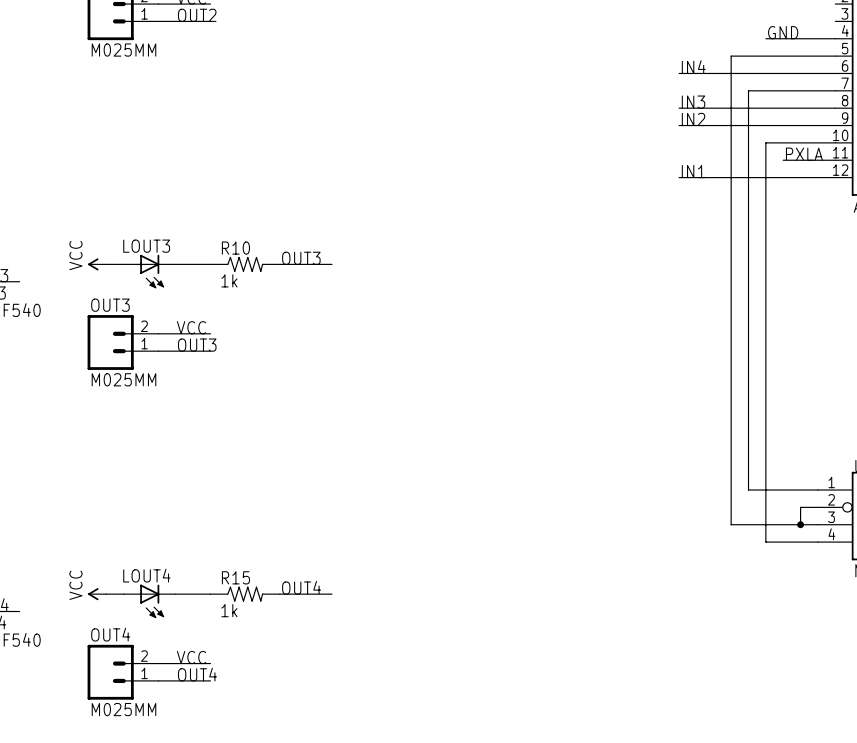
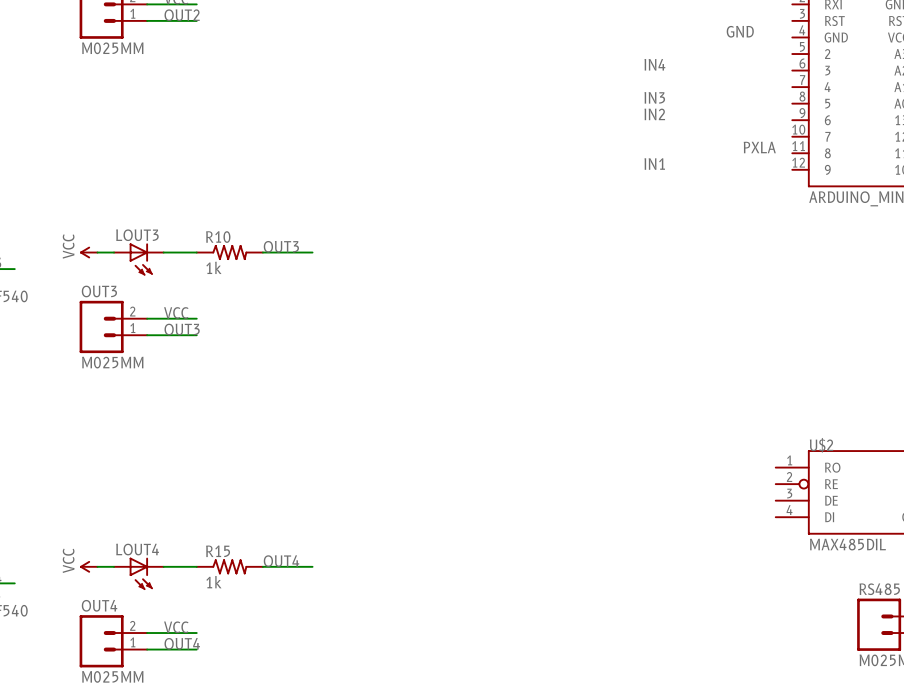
wire: (765, 38) (835, 38) -> none
wire: (835, 56) (731, 56) (731, 524) (817, 524) -> none
wire: (679, 73) (835, 73) -> none
wire: (835, 90) (748, 90) (748, 490) (817, 490) -> none
wire: (679, 108) (835, 108) -> none
wire: (679, 125) (835, 125) -> none
wire: (835, 142) (765, 142) (765, 542) (817, 542) -> none
wire: (783, 160) (835, 160) -> none
wire: (679, 177) (835, 177) -> none
wire: (817, 507) (800, 507) (800, 524) -> none
junction: (800, 524) -> none

